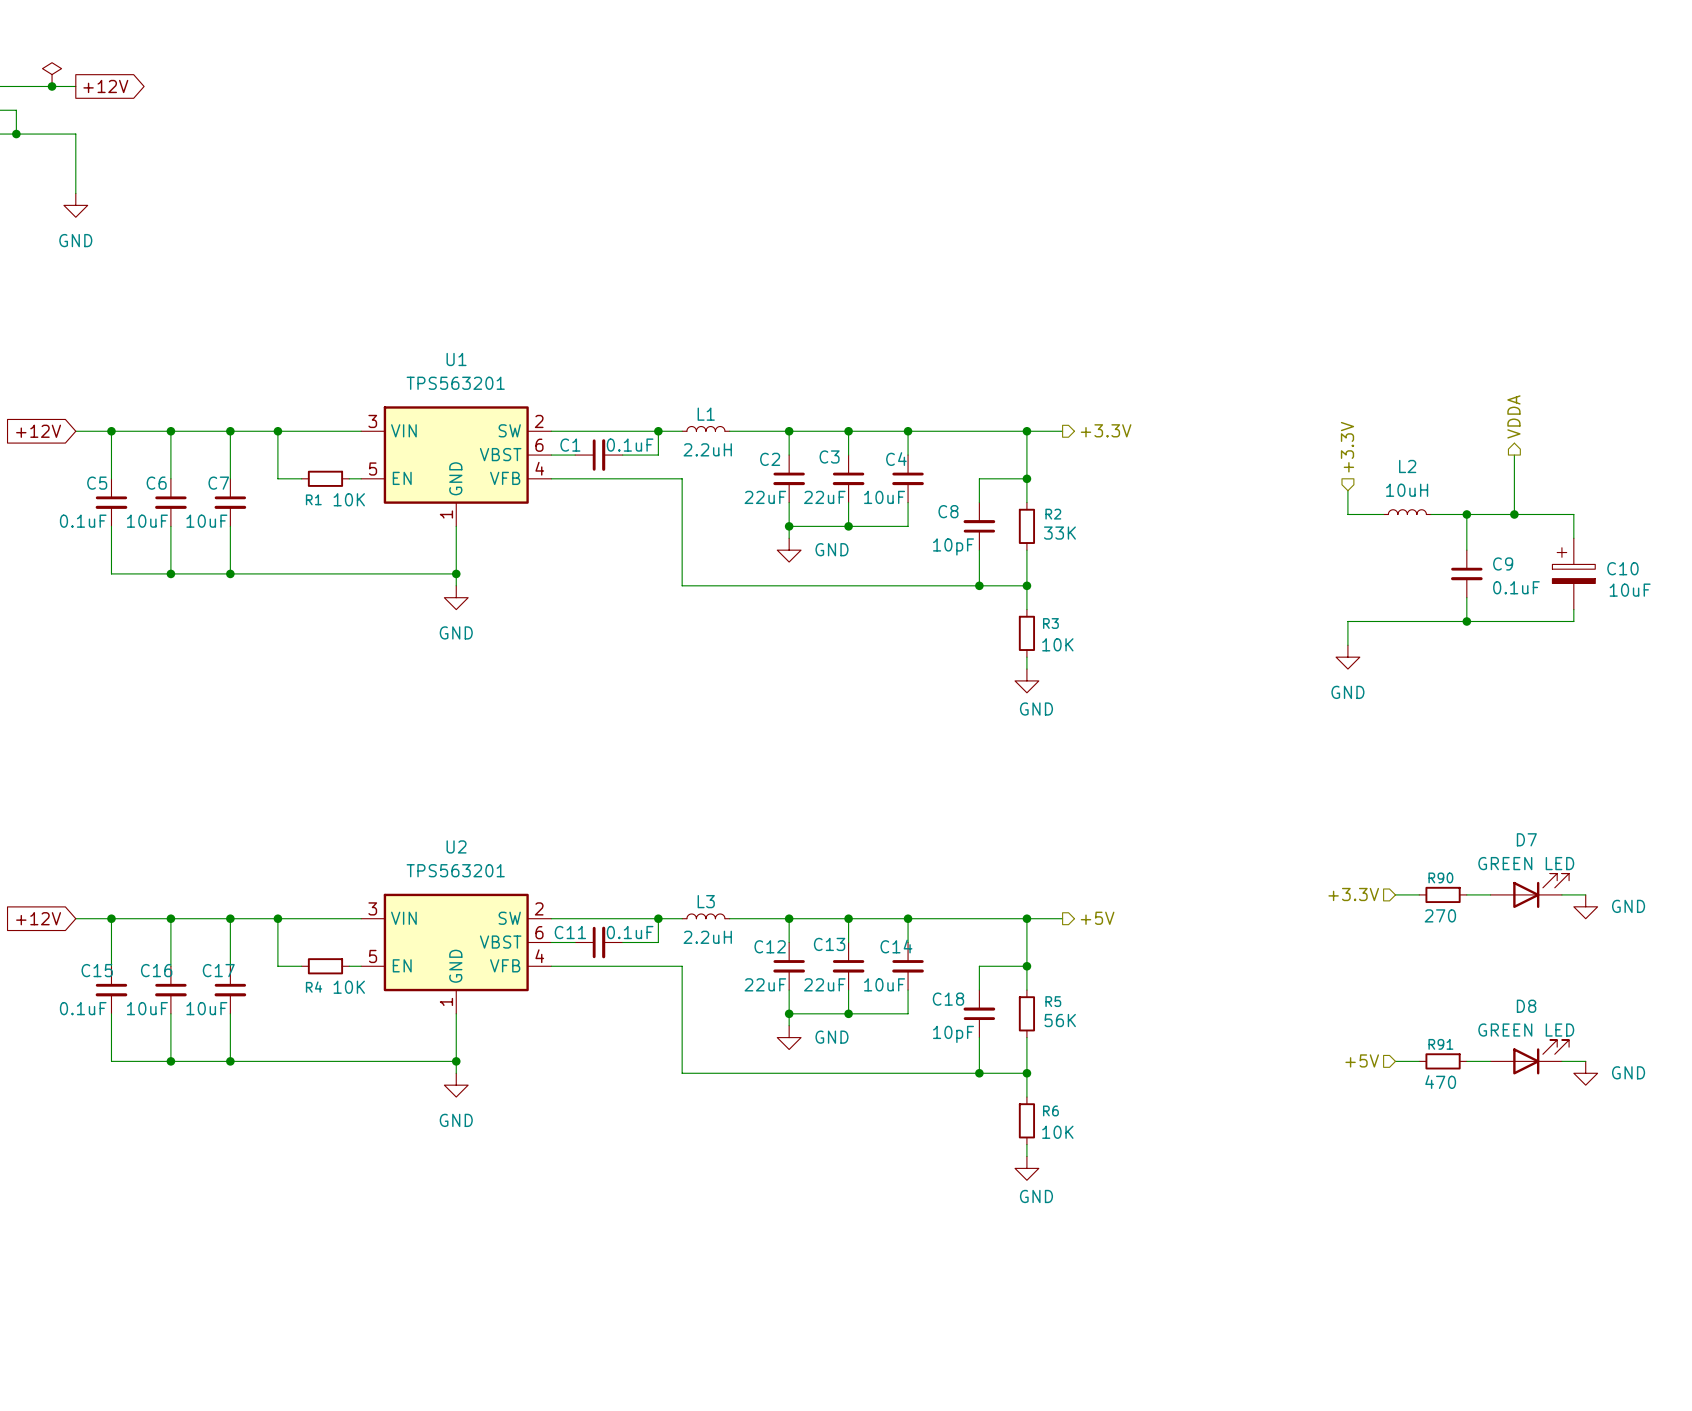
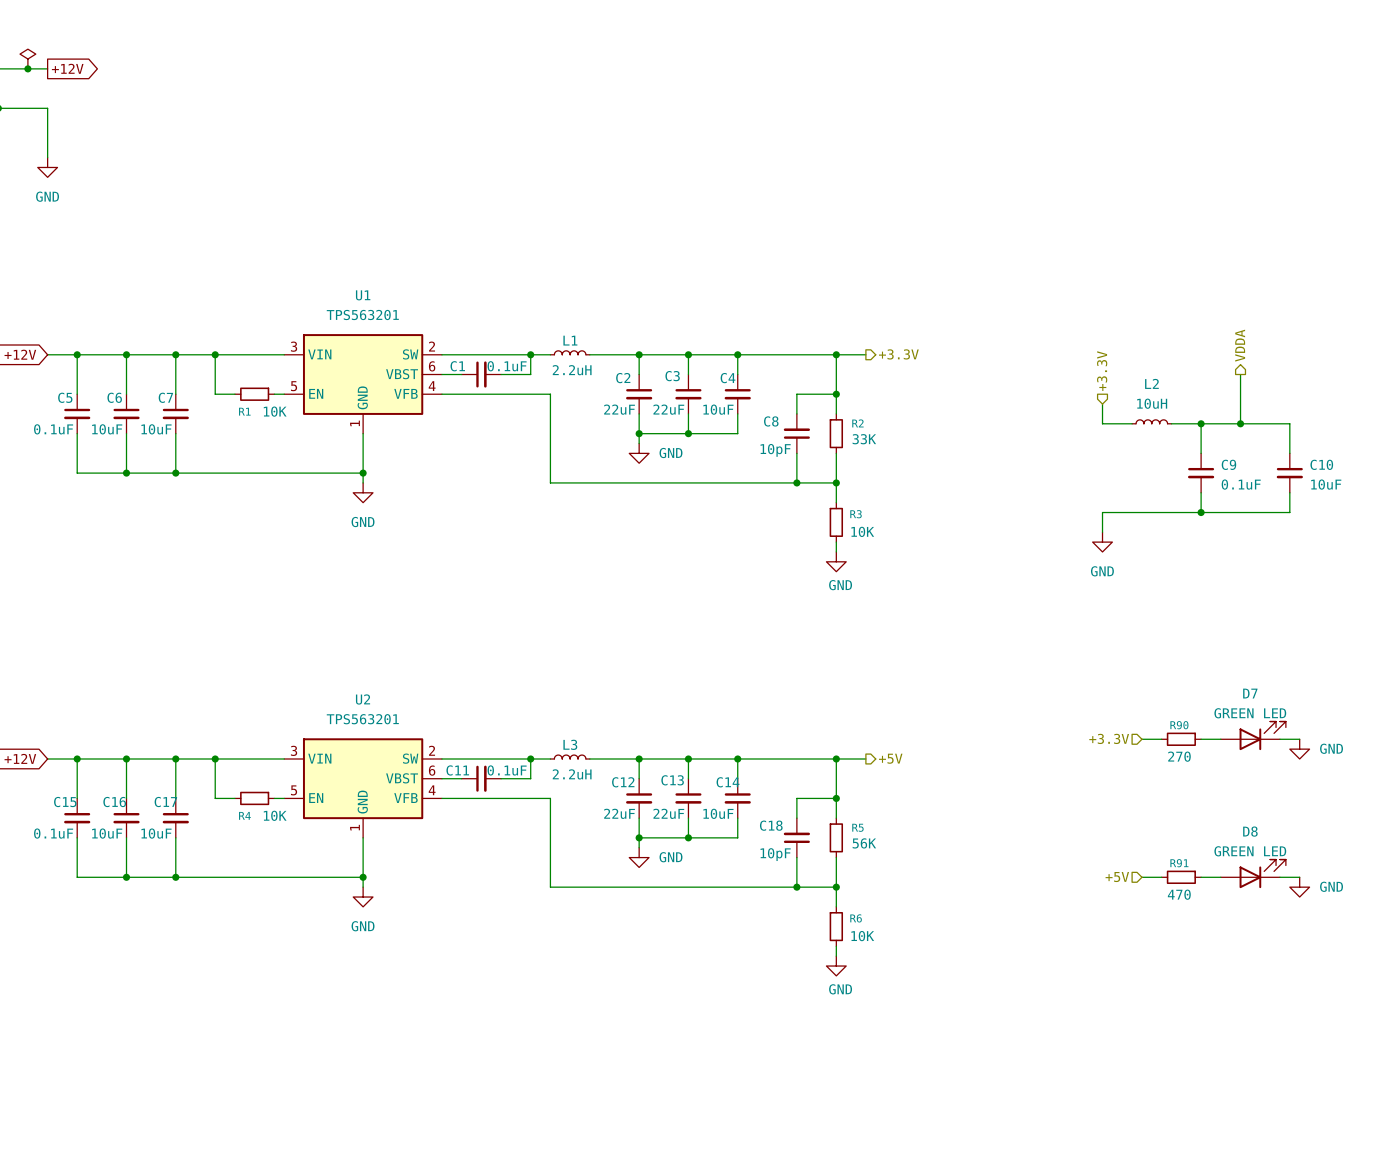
C10 symbol: [1552, 538, 1596, 610] -> [1276, 453, 1303, 493]

